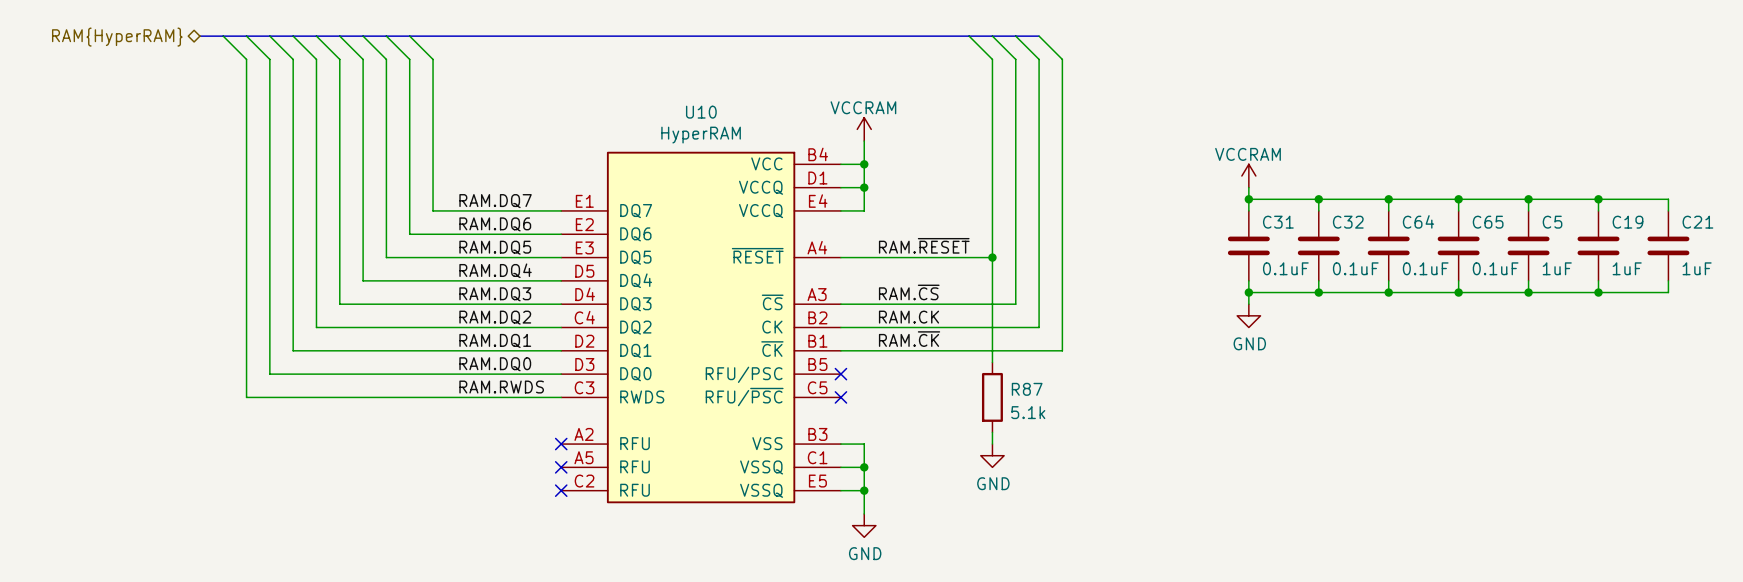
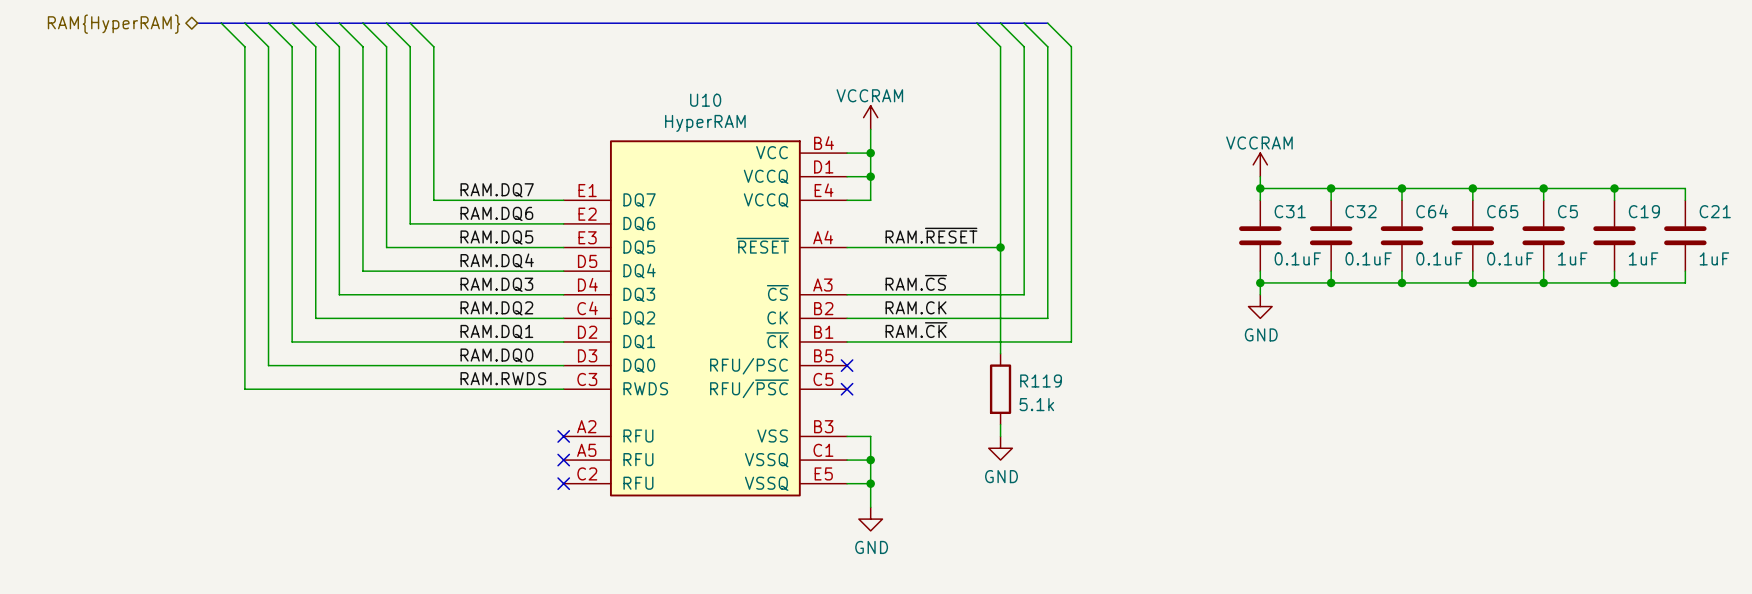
R87 name: R87 (1027, 389) -> R119 (1041, 381)

